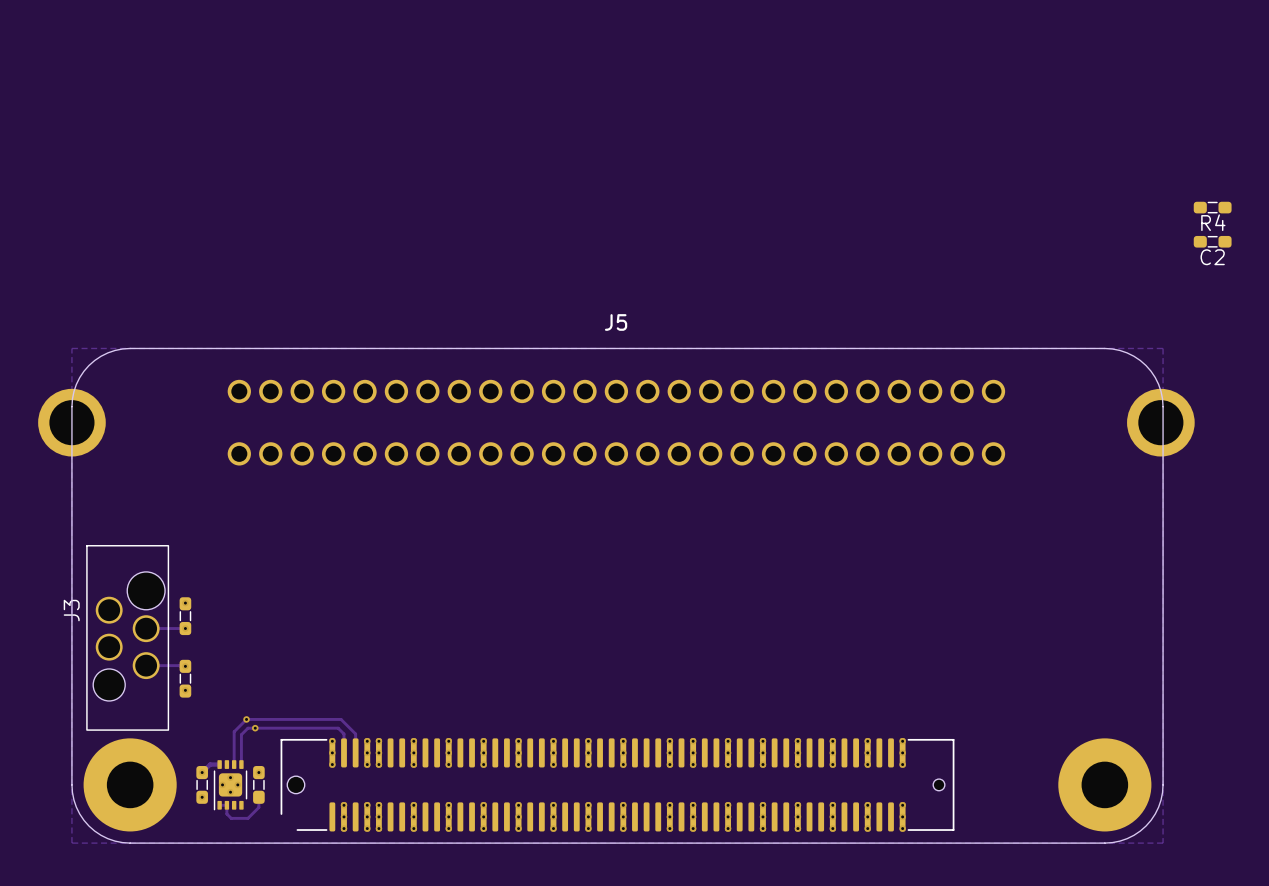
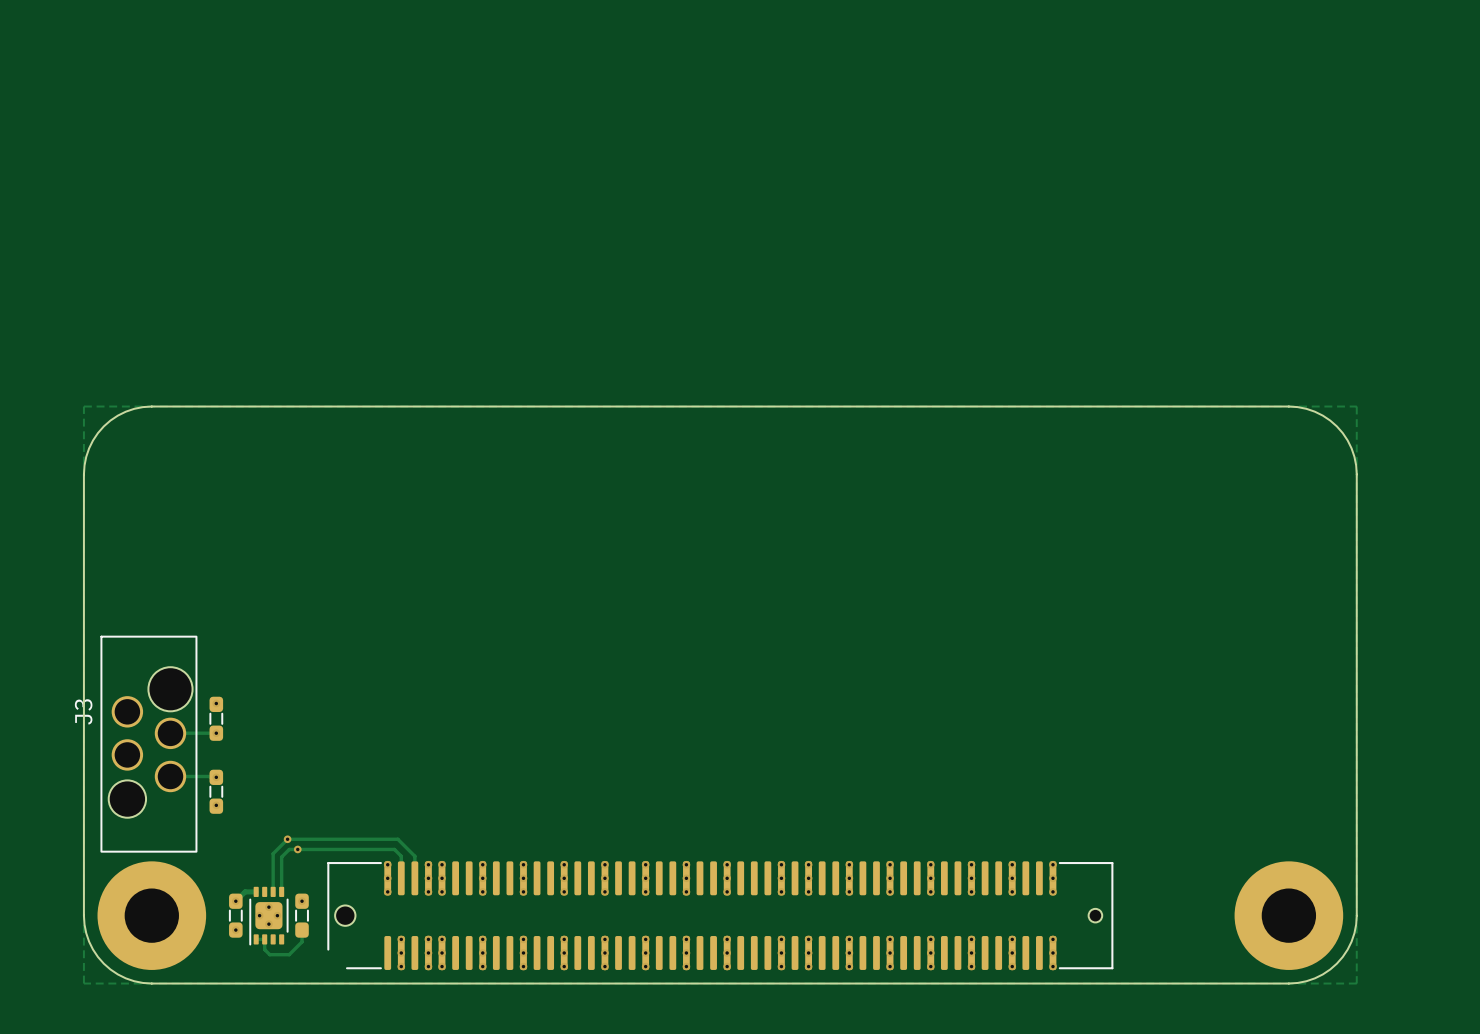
R4: (1212, 207) -> none
C2: (1212, 241) -> none
J5: (616, 422) -> none

